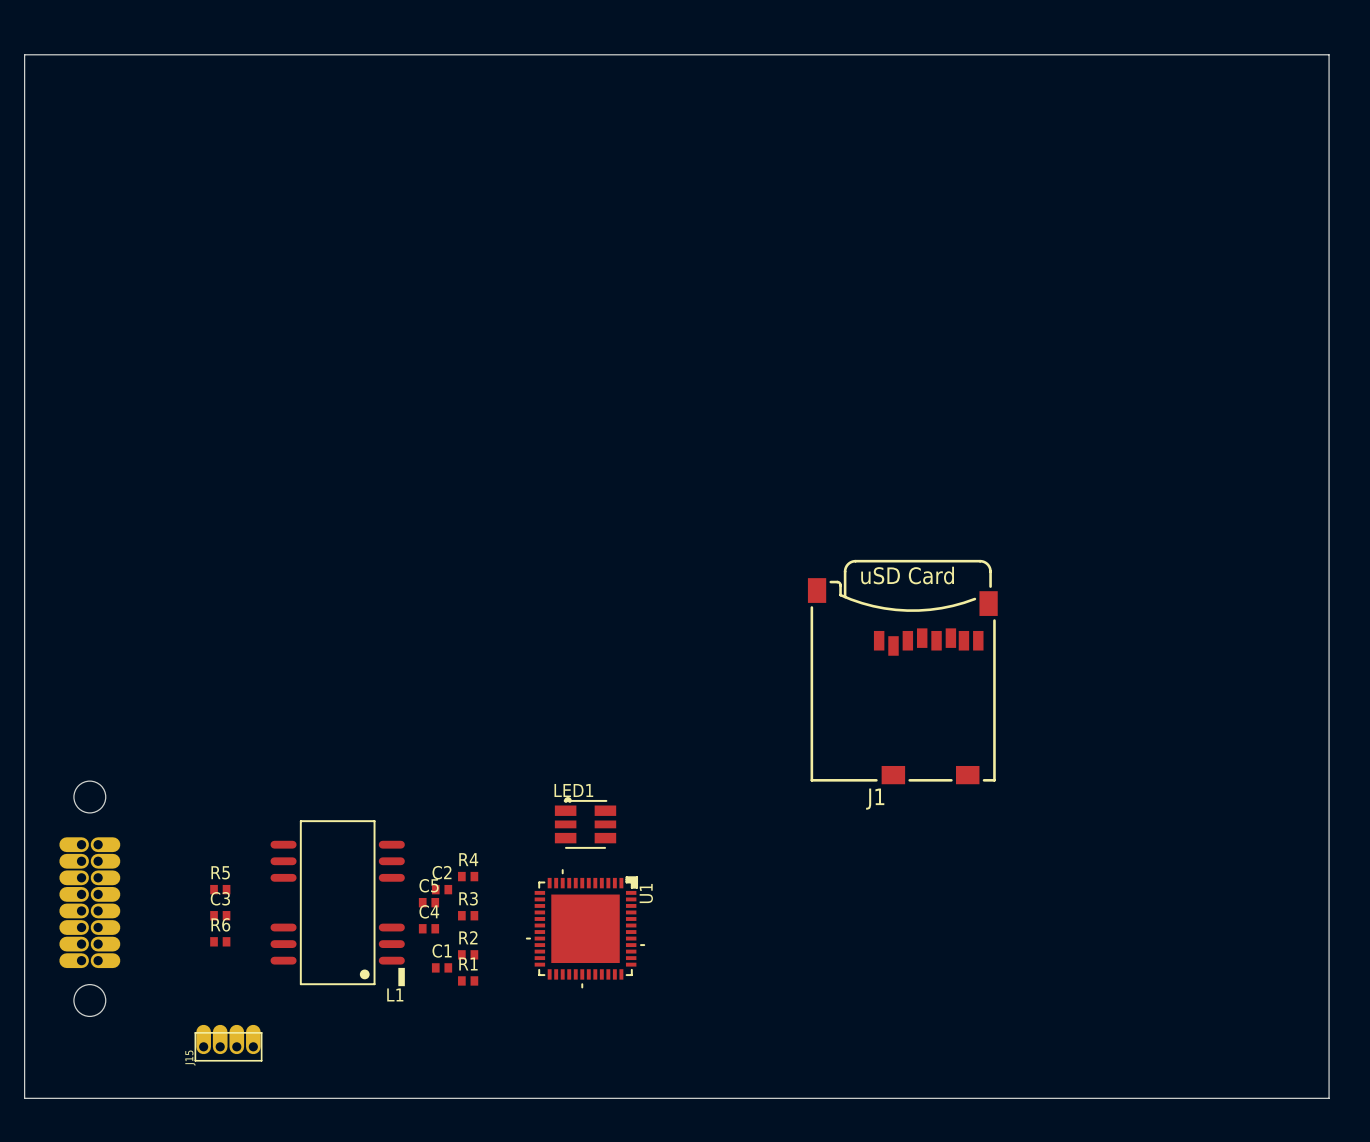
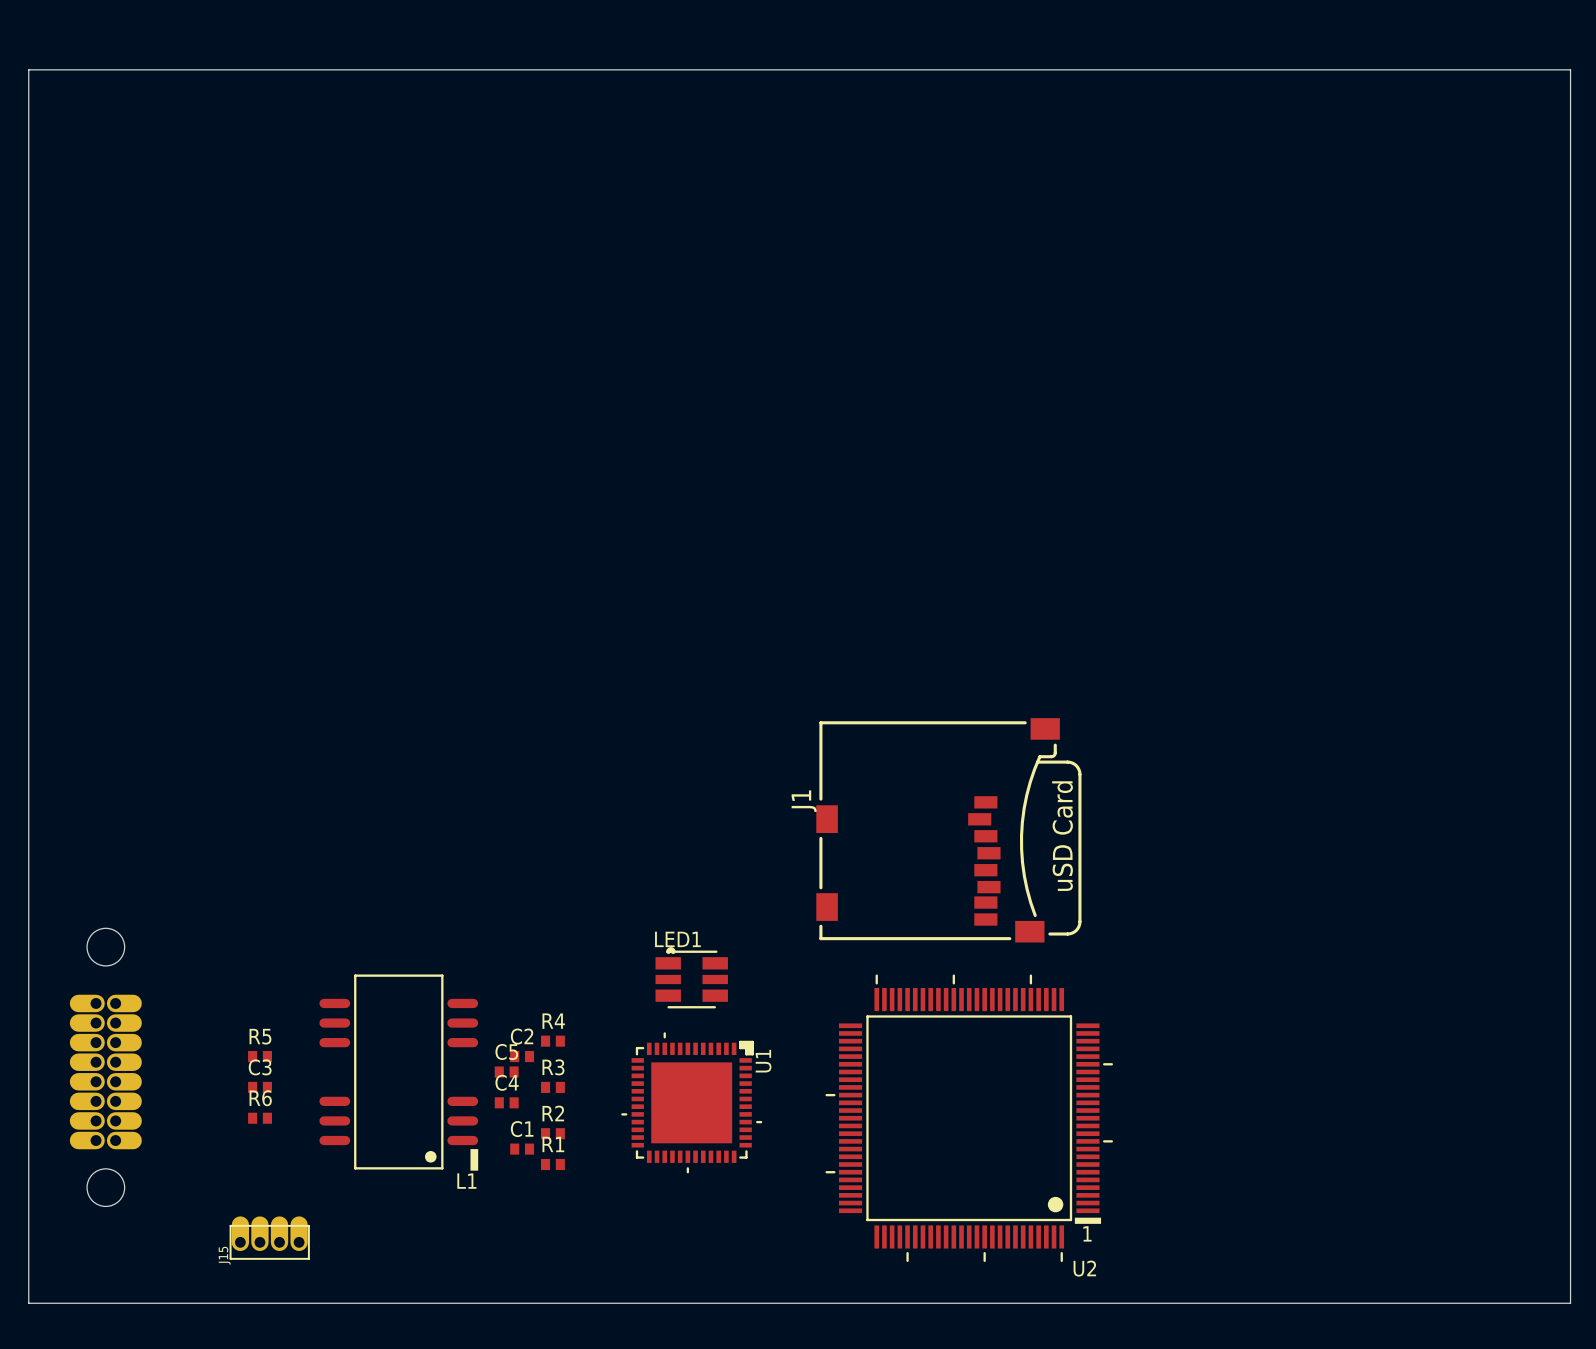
J1 footprint: [807, 559, 998, 785] -> [816, 718, 1082, 943]
J1 name position: J1 (875, 799) -> J1 (804, 801)
U2: none -> (969, 1118)

